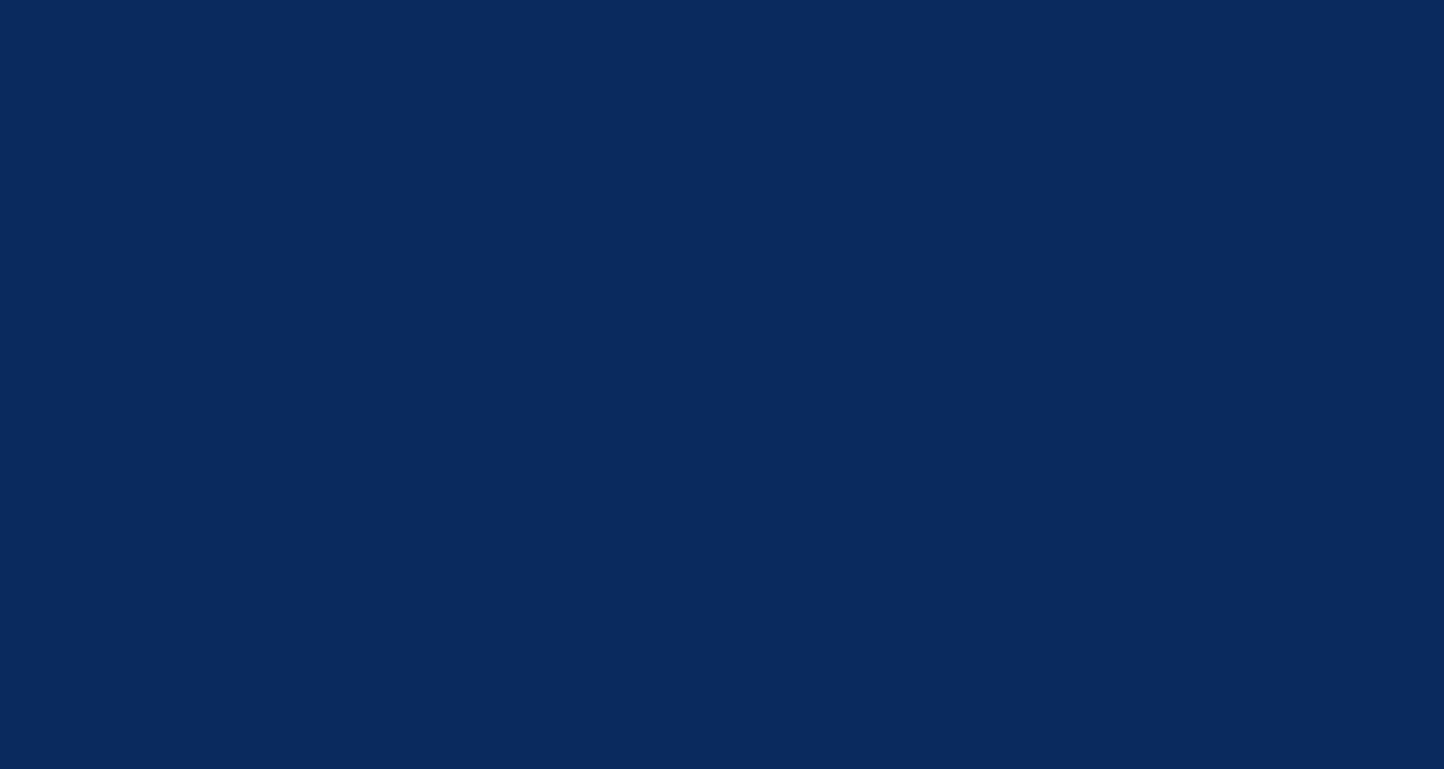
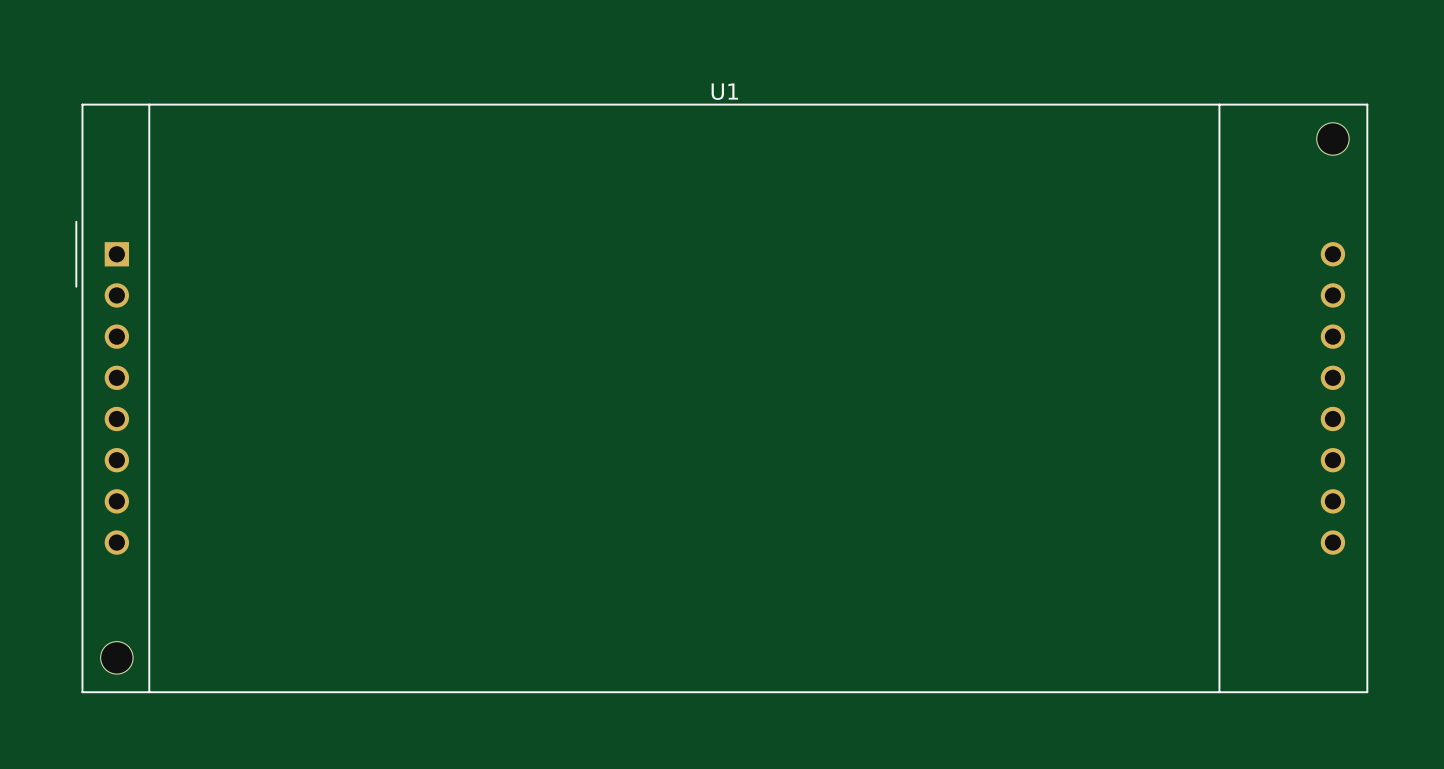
U1: none -> (721, 398)

